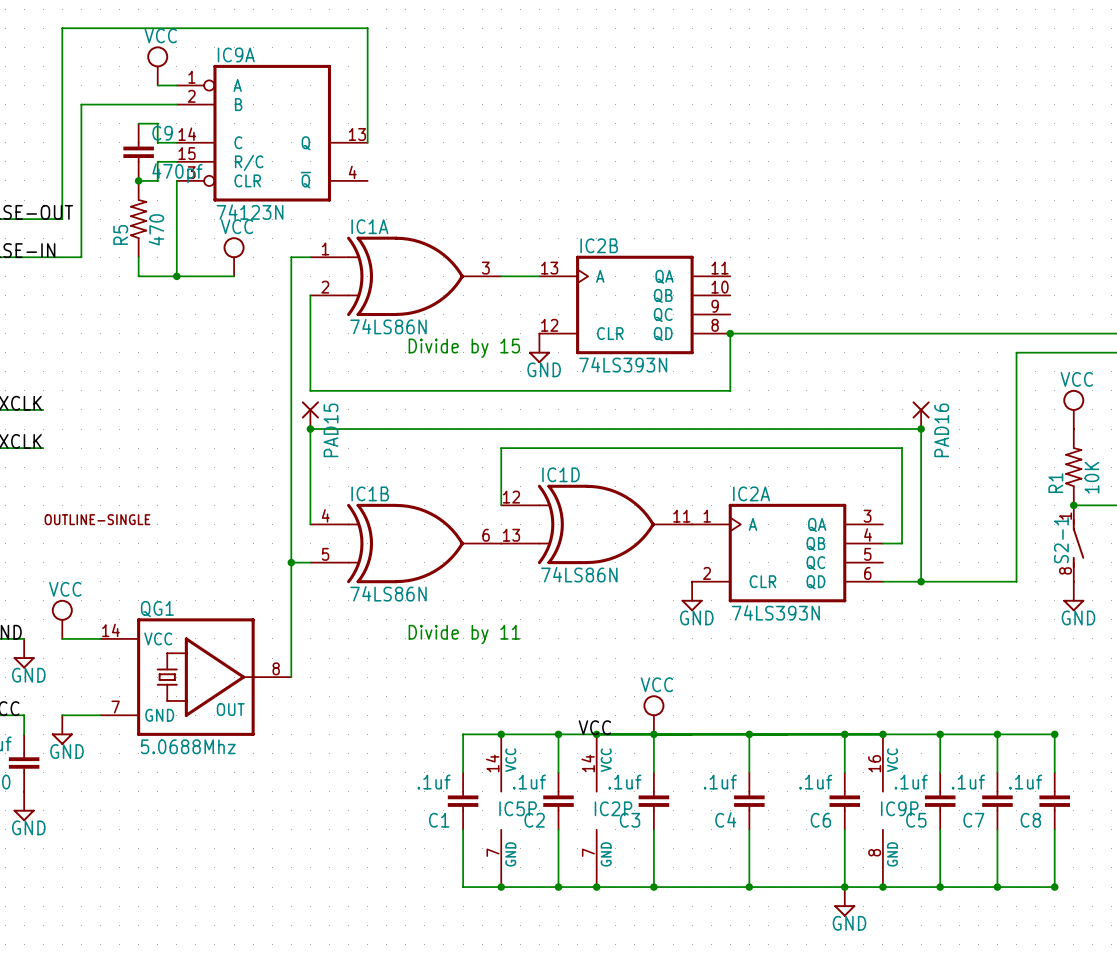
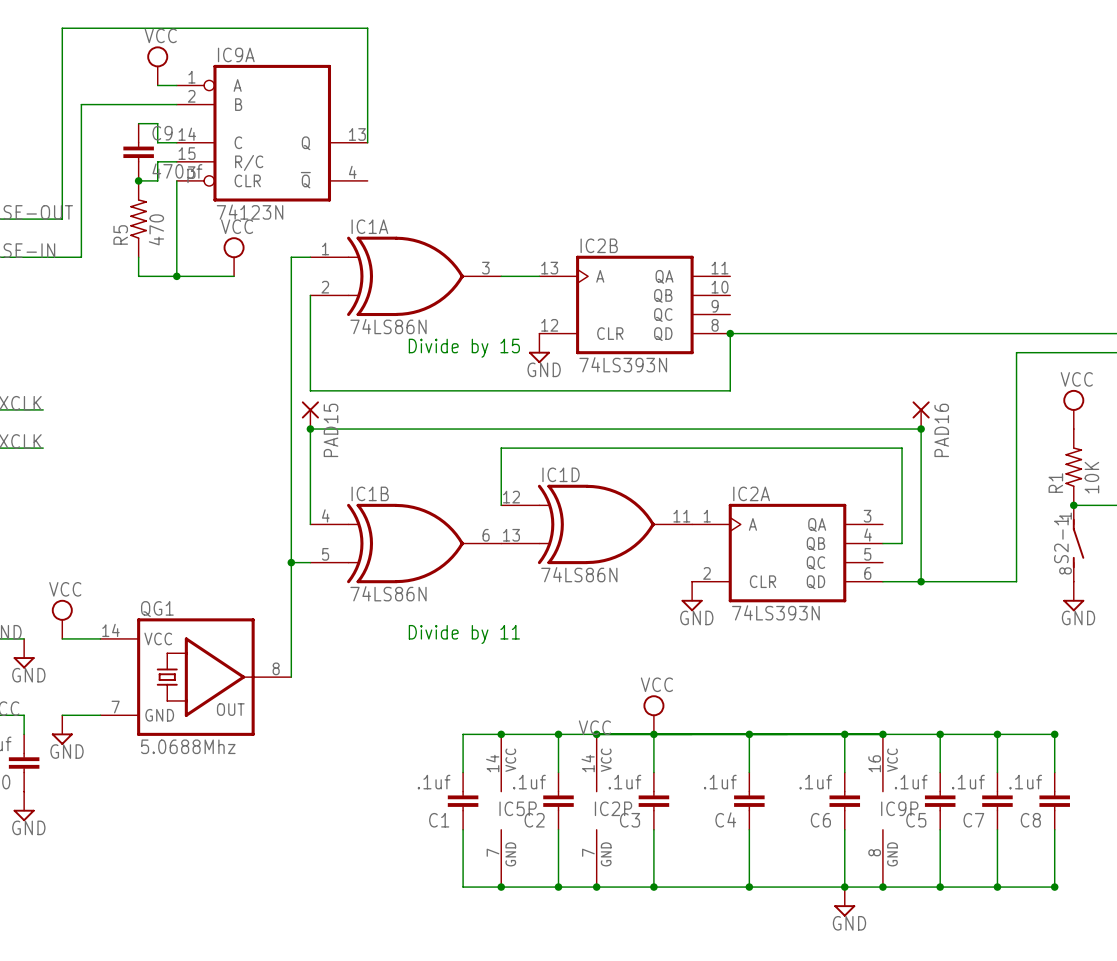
part: OUTLINE-SINGLE (97, 519) -> none

